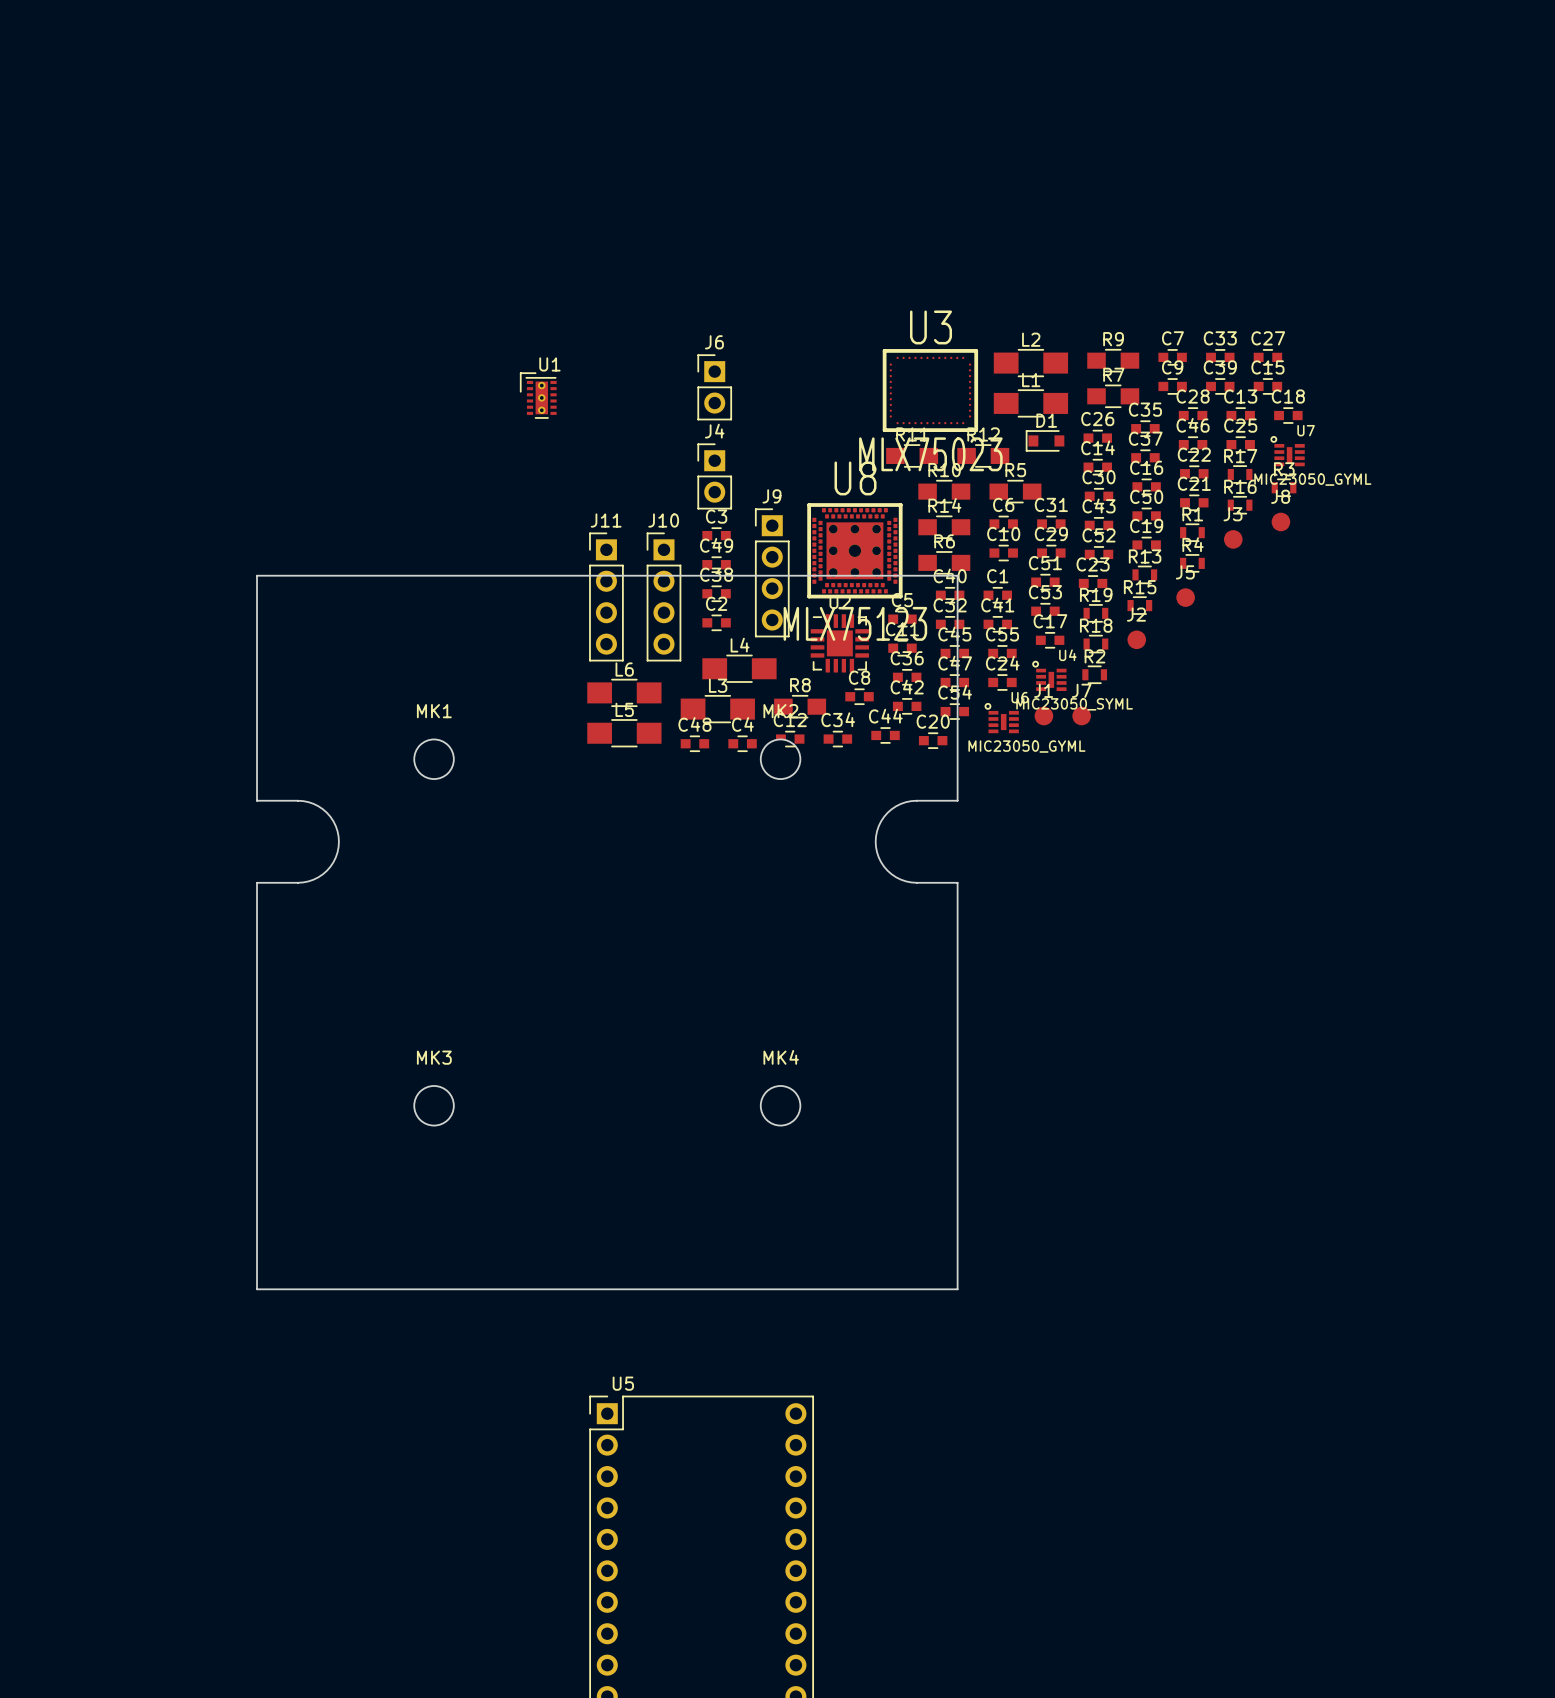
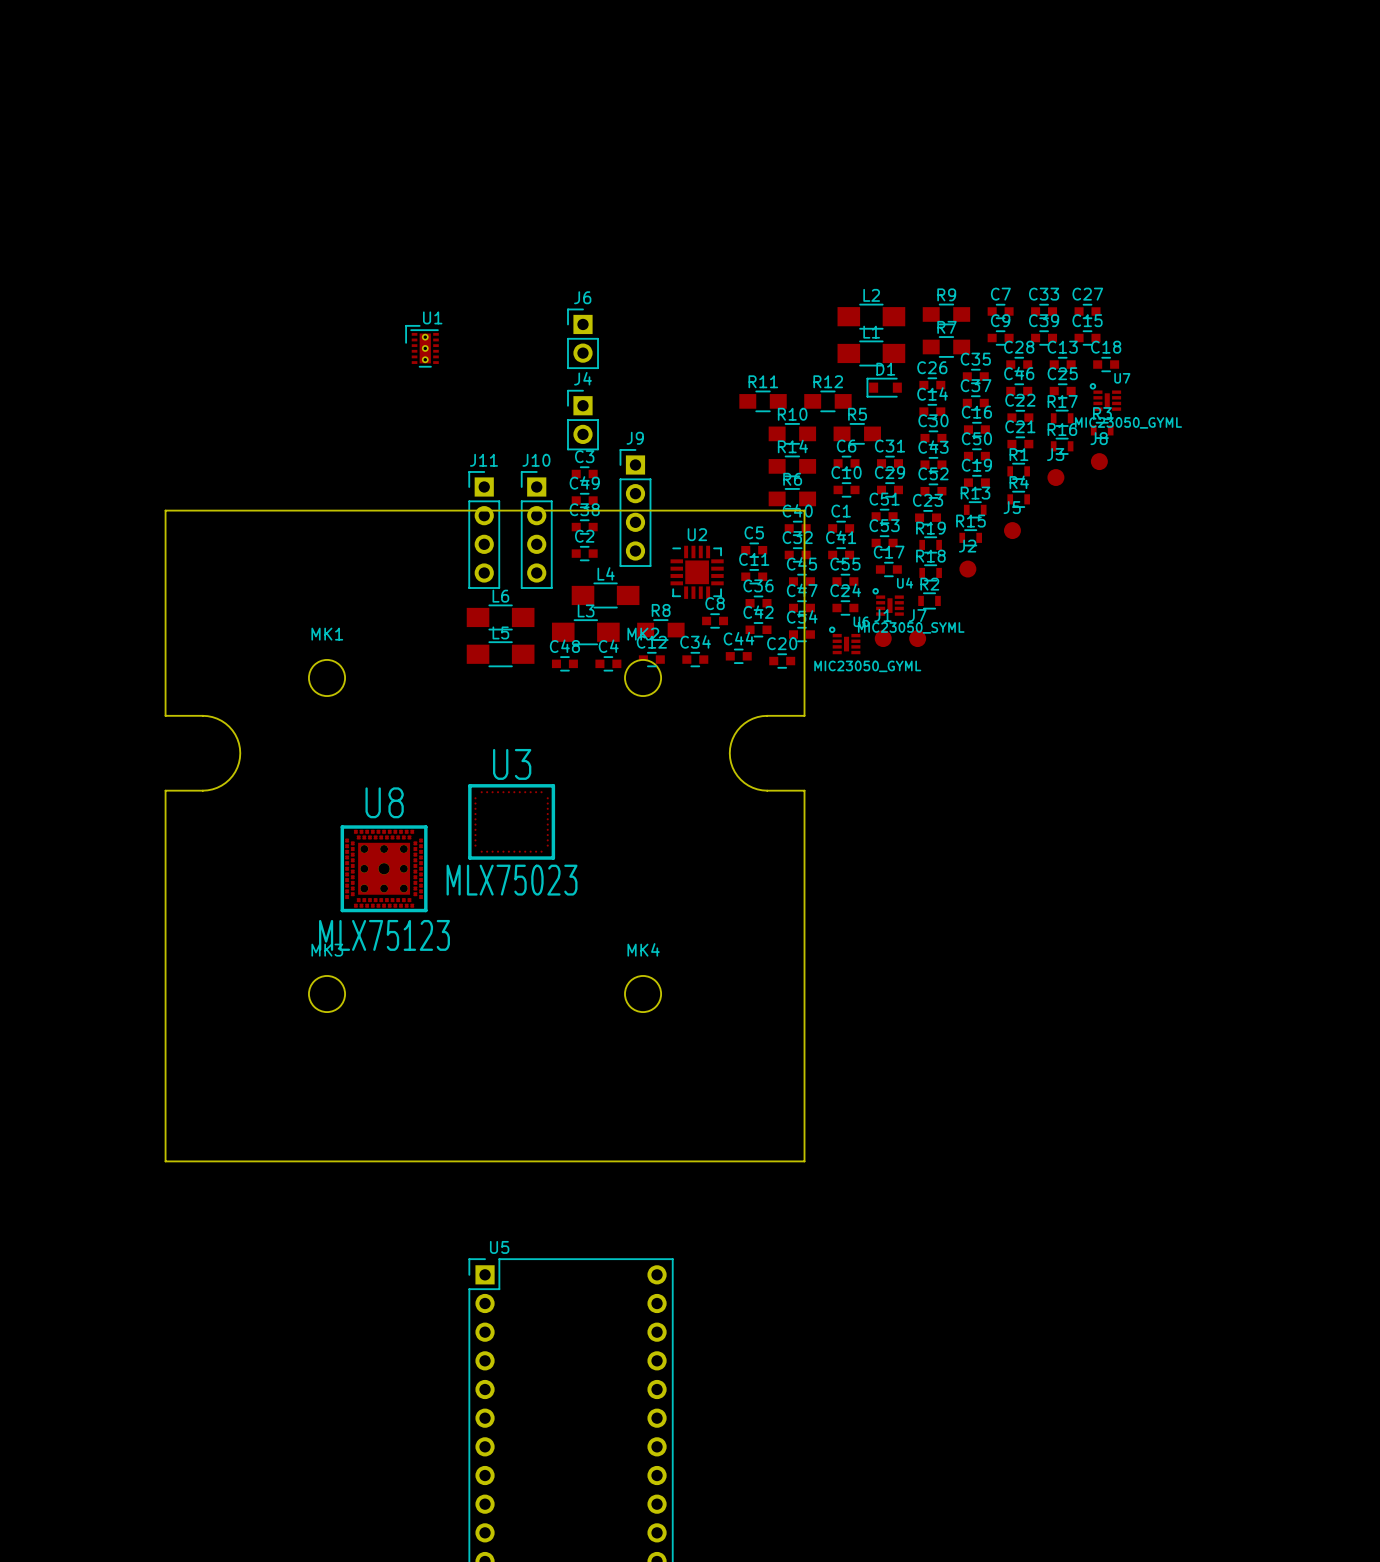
U3 position: (930, 390) -> (511, 821)
U8 position: (854, 550) -> (384, 868)

